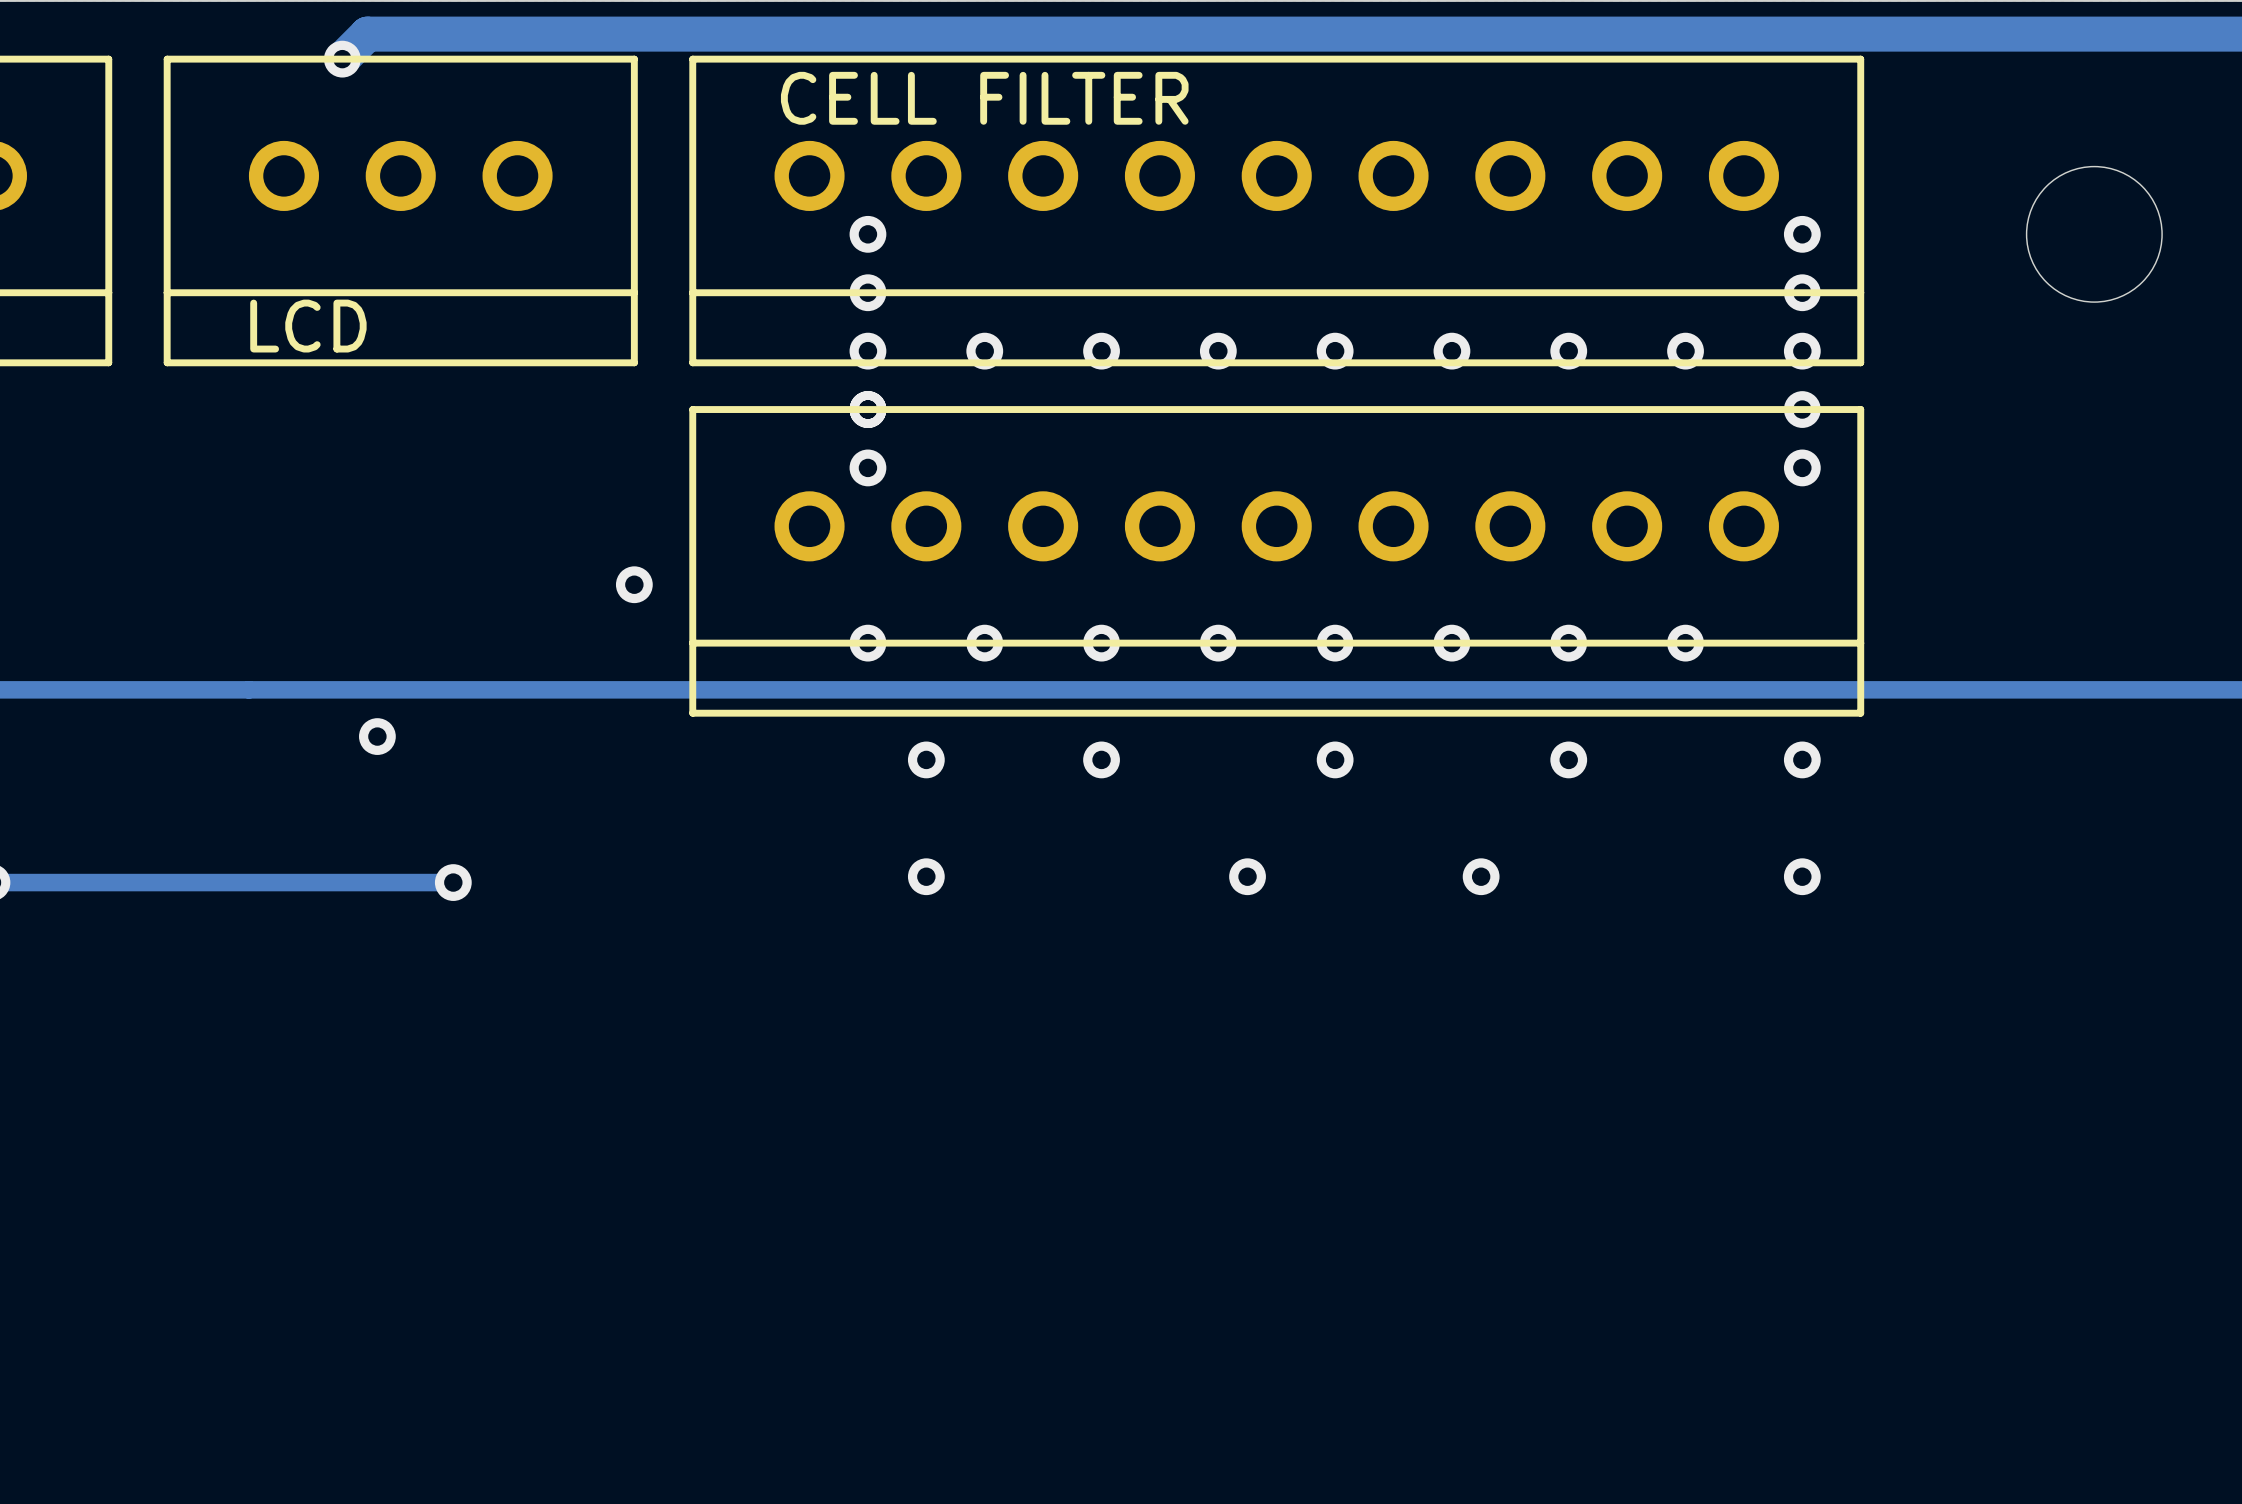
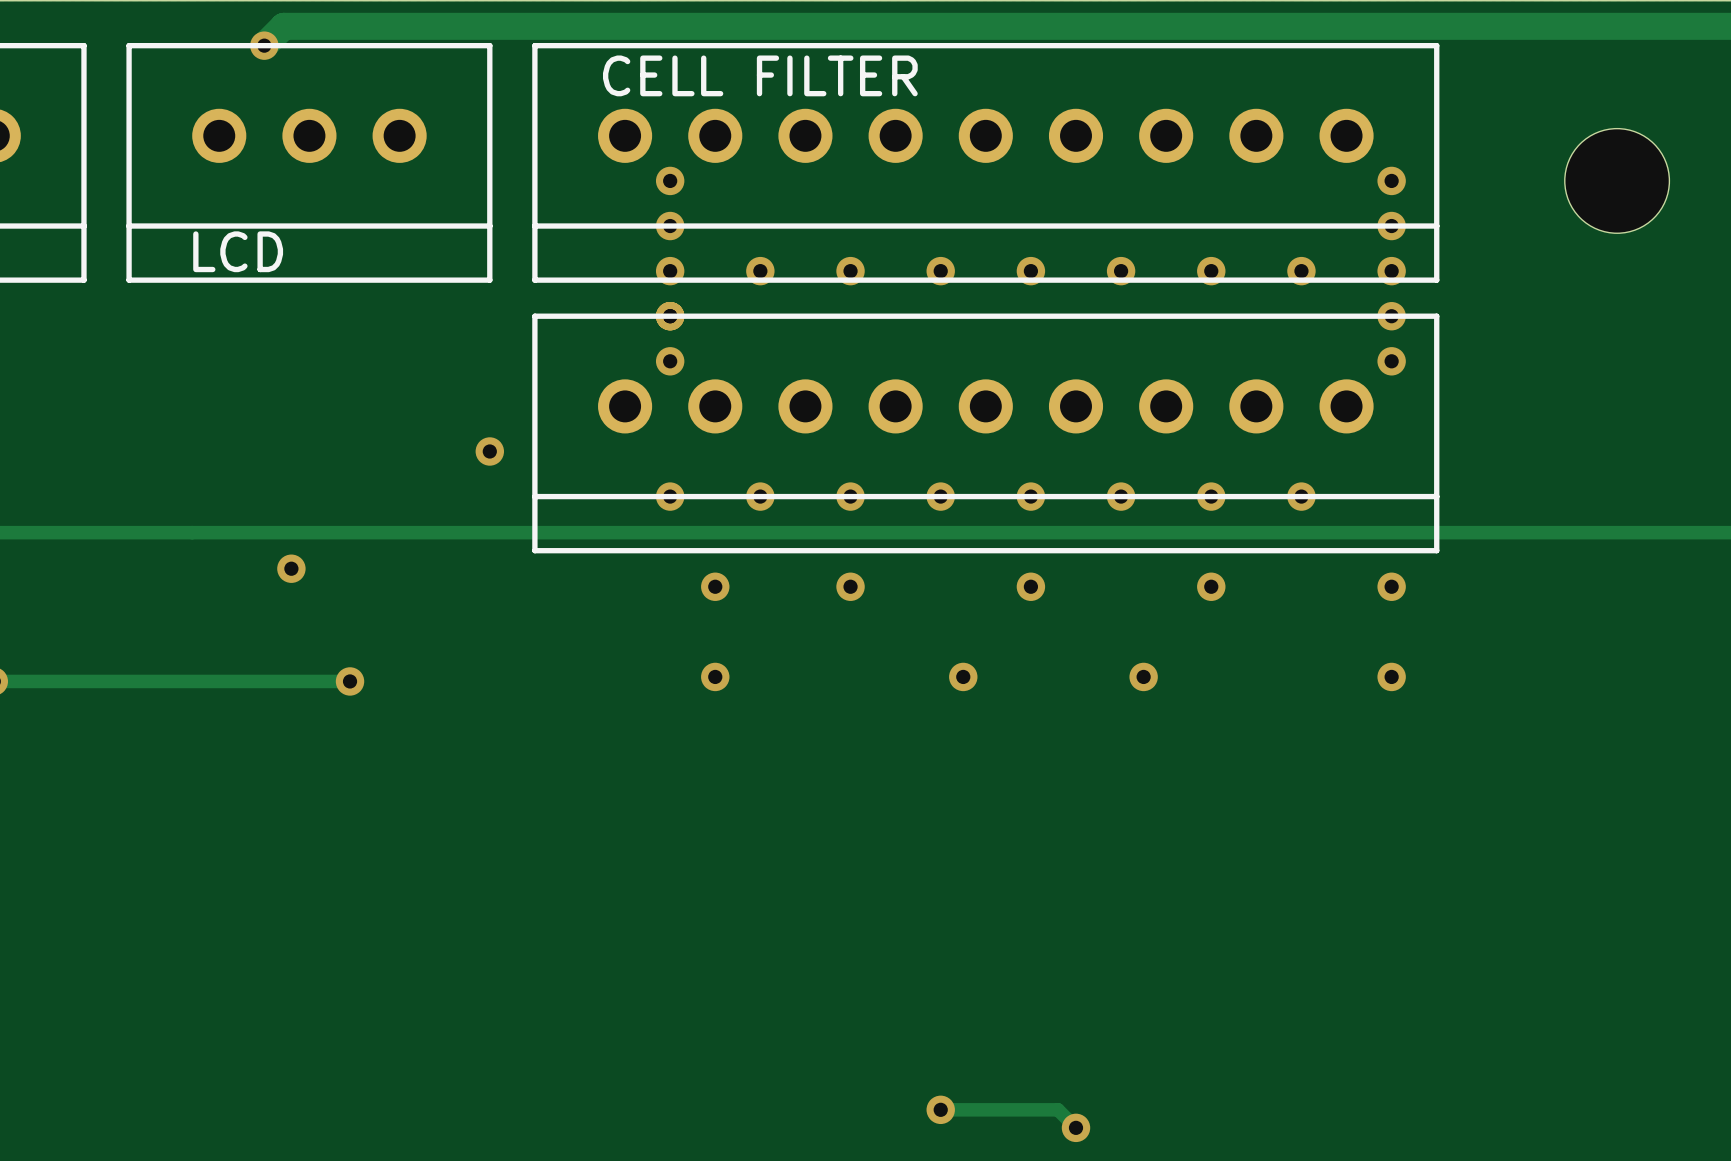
track: none -> (940, 1109) (1057, 1109) (1076, 1127)
via: none -> (940, 1109)
via: none -> (1076, 1127)

